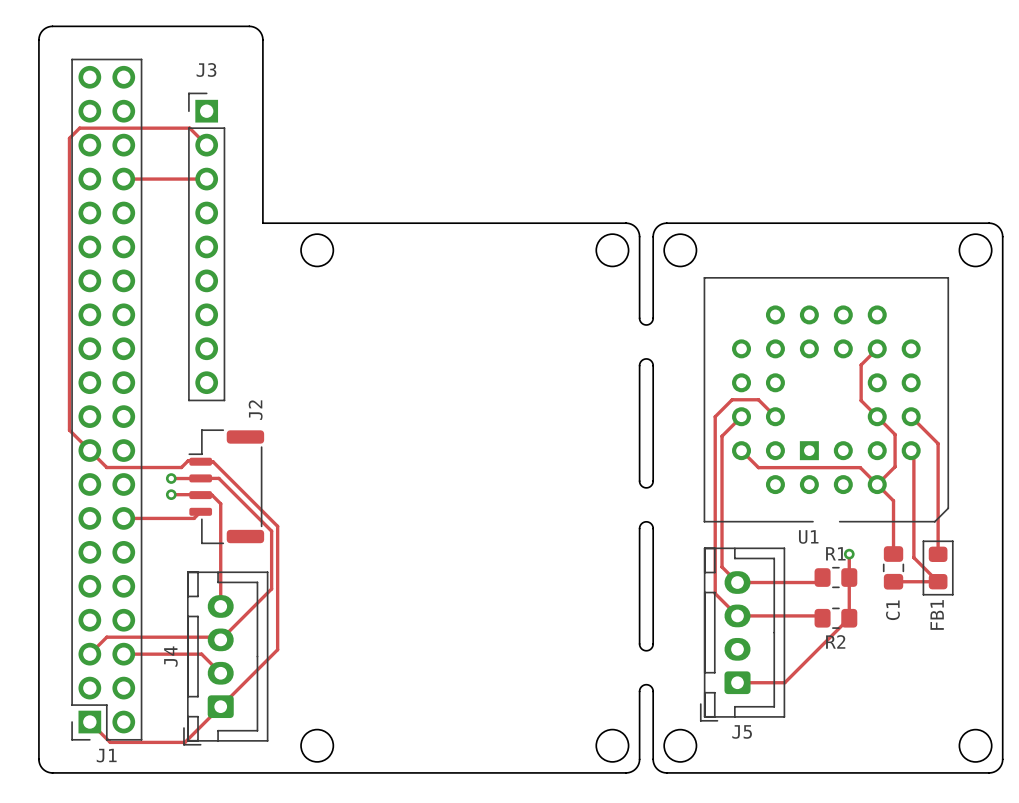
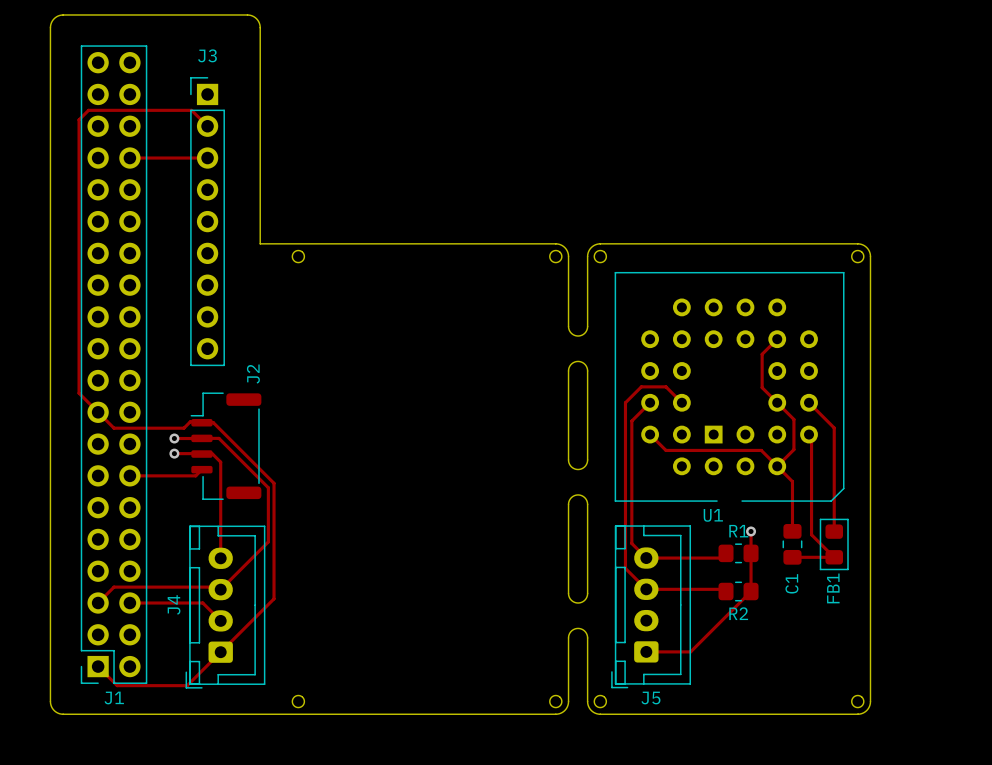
board edge: (262, 223) (629, 223) (635, 227) (639, 234) (639, 319) (641, 323) (646, 324) (650, 323) (653, 319) (653, 234) (655, 228) (663, 223) (989, 223) (997, 225) (1002, 236) (1002, 761) (998, 768) (990, 772) (901, 772) -> (260, 199) (260, 243) (560, 244) (565, 248) (568, 254) (568, 327) (571, 333) (576, 335) (582, 334) (587, 328) (587, 254) (590, 248) (597, 244) (857, 243) (865, 246) (870, 256) (870, 701) (866, 710) (857, 714)
round board edge: [300, 233, 335, 268] -> none
round board edge: [595, 233, 630, 268] -> none
round board edge: [663, 233, 698, 268] -> none
round board edge: [958, 233, 993, 268] -> none
board edge: none -> (302, 252) (298, 250) (293, 252) (292, 256) (294, 260) (298, 262) (302, 260) (304, 256) (302, 252)
board edge: none -> (559, 252) (555, 250) (551, 252) (549, 256) (551, 260) (555, 262) (560, 260) (561, 256) (560, 252)
board edge: none -> (604, 252) (600, 250) (595, 252) (594, 256) (596, 260) (600, 262) (604, 260) (606, 256) (604, 252)
board edge: none -> (861, 252) (857, 250) (853, 252) (851, 256) (853, 260) (857, 262) (862, 260) (863, 256) (862, 252)
track: (877, 348) (861, 364) (861, 400) (895, 434) (895, 466) (877, 484) -> (777, 339) (762, 354) (762, 387) (793, 419) (793, 449) (777, 466)
board edge: (639, 365) (639, 481) (641, 485) (646, 487) (651, 485) (653, 481) (653, 365) (651, 360) (646, 358) (641, 360) (639, 365) -> none
U1 position: (826, 399) -> (729, 386)
board edge: none -> (568, 370) (568, 461) (572, 467) (579, 469) (584, 466) (587, 461) (587, 369) (583, 363) (576, 361) (570, 365) (568, 370)
track: (741, 416) (722, 436) (722, 567) (737, 582) (817, 582) (822, 577) -> (650, 402) (631, 421) (631, 543) (646, 558) (721, 558) (726, 553)
track: (775, 416) (758, 399) (732, 399) (715, 416) (715, 593) (737, 615) (820, 615) (822, 618) -> (681, 402) (665, 386) (641, 386) (625, 402) (625, 568) (646, 589) (723, 589) (726, 591)
track: (911, 416) (938, 443) (938, 554) -> (809, 402) (834, 427) (834, 531)
track: (741, 450) (758, 467) (860, 467) (893, 500) (893, 554) -> (650, 434) (665, 450) (761, 450) (792, 481) (792, 531)
track: (911, 450) (913, 453) (913, 557) (937, 581) -> (809, 434) (811, 437) (811, 534) (834, 557)
board edge: (639, 528) (639, 643) (641, 648) (646, 650) (651, 648) (653, 643) (653, 528) (651, 523) (646, 521) (641, 523) (639, 528) -> none
board edge: none -> (568, 504) (568, 594) (572, 601) (579, 602) (584, 600) (587, 594) (587, 503) (584, 497) (578, 494) (571, 497) (568, 504)
track: (849, 554) (849, 618) (784, 682) (737, 682) -> (751, 531) (751, 591) (690, 651) (646, 651)
via position: (849, 554) -> (751, 531)
C1 position: (893, 567) -> (792, 544)
FB1 position: (938, 568) -> (834, 544)
R1 position: (835, 577) -> (738, 553)
track: (893, 581) (936, 581) -> (792, 557) (832, 557)
R2 position: (835, 618) -> (738, 591)
J5 position: (742, 634) -> (651, 606)
round board edge: [300, 728, 335, 763] -> none
round board edge: [595, 728, 630, 763] -> none
round board edge: [663, 728, 698, 763] -> none
round board edge: [958, 728, 993, 763] -> none
board edge: none -> (302, 697) (298, 695) (293, 697) (292, 701) (294, 705) (298, 707) (302, 705) (304, 701) (302, 697)
board edge: none -> (559, 697) (555, 695) (551, 697) (549, 701) (551, 705) (555, 707) (560, 705) (561, 701) (560, 697)
board edge: none -> (604, 697) (600, 695) (595, 697) (594, 701) (596, 705) (600, 707) (604, 705) (606, 701) (604, 697)
board edge: none -> (861, 697) (857, 695) (853, 697) (851, 701) (853, 705) (857, 707) (862, 705) (863, 701) (862, 697)
board edge: (578, 772) (627, 772) (636, 767) (639, 759) (639, 690) (641, 686) (646, 684) (650, 686) (653, 690) (653, 762) (658, 770) (666, 772) -> (555, 714) (563, 711) (568, 704) (568, 636) (572, 630) (578, 628) (583, 630) (587, 636) (587, 701) (590, 709) (598, 714) (638, 714)

